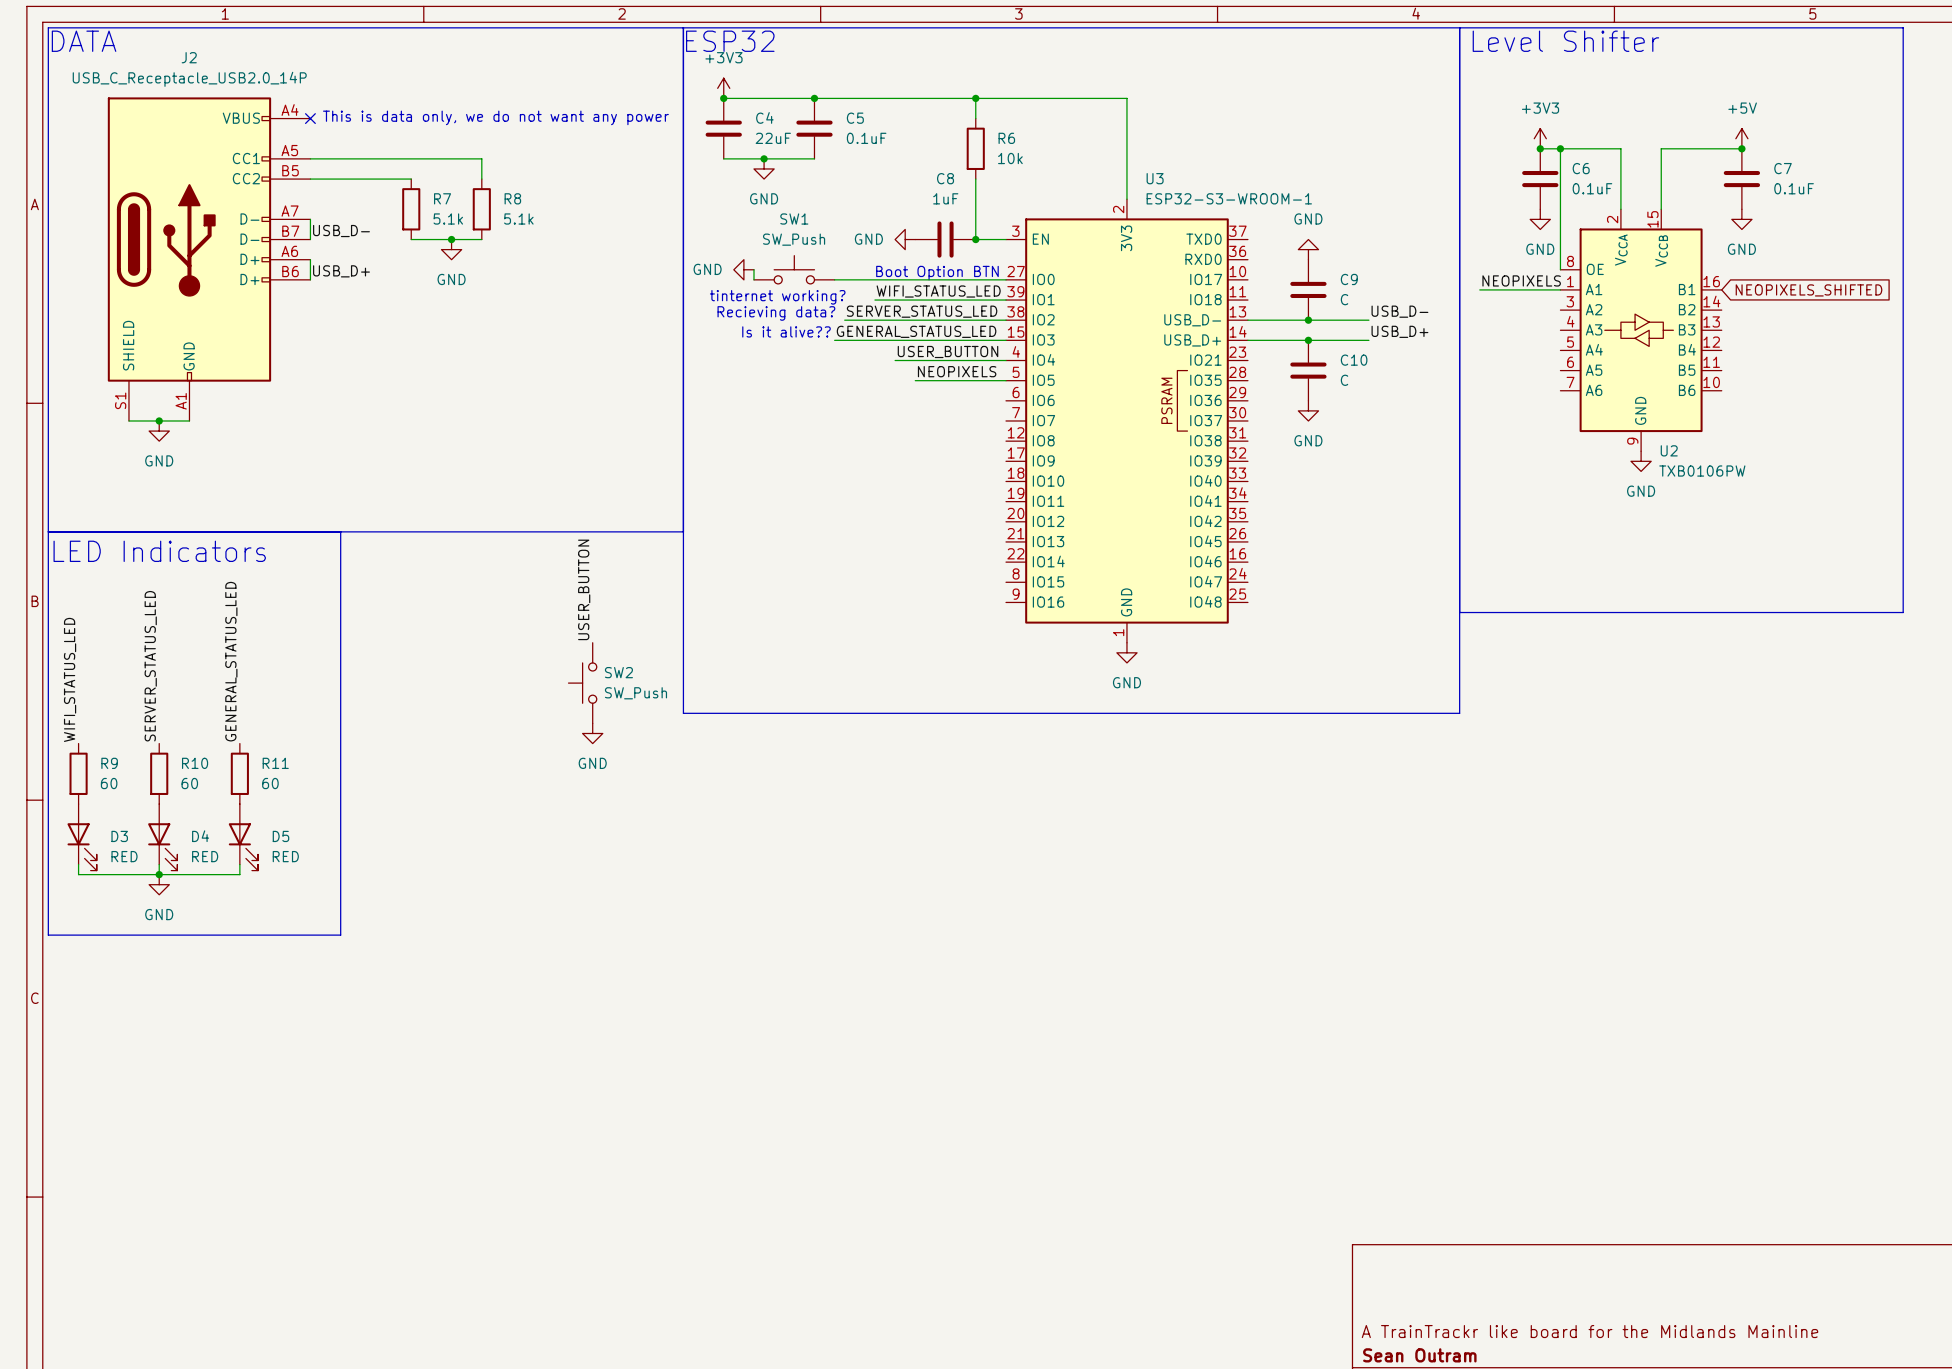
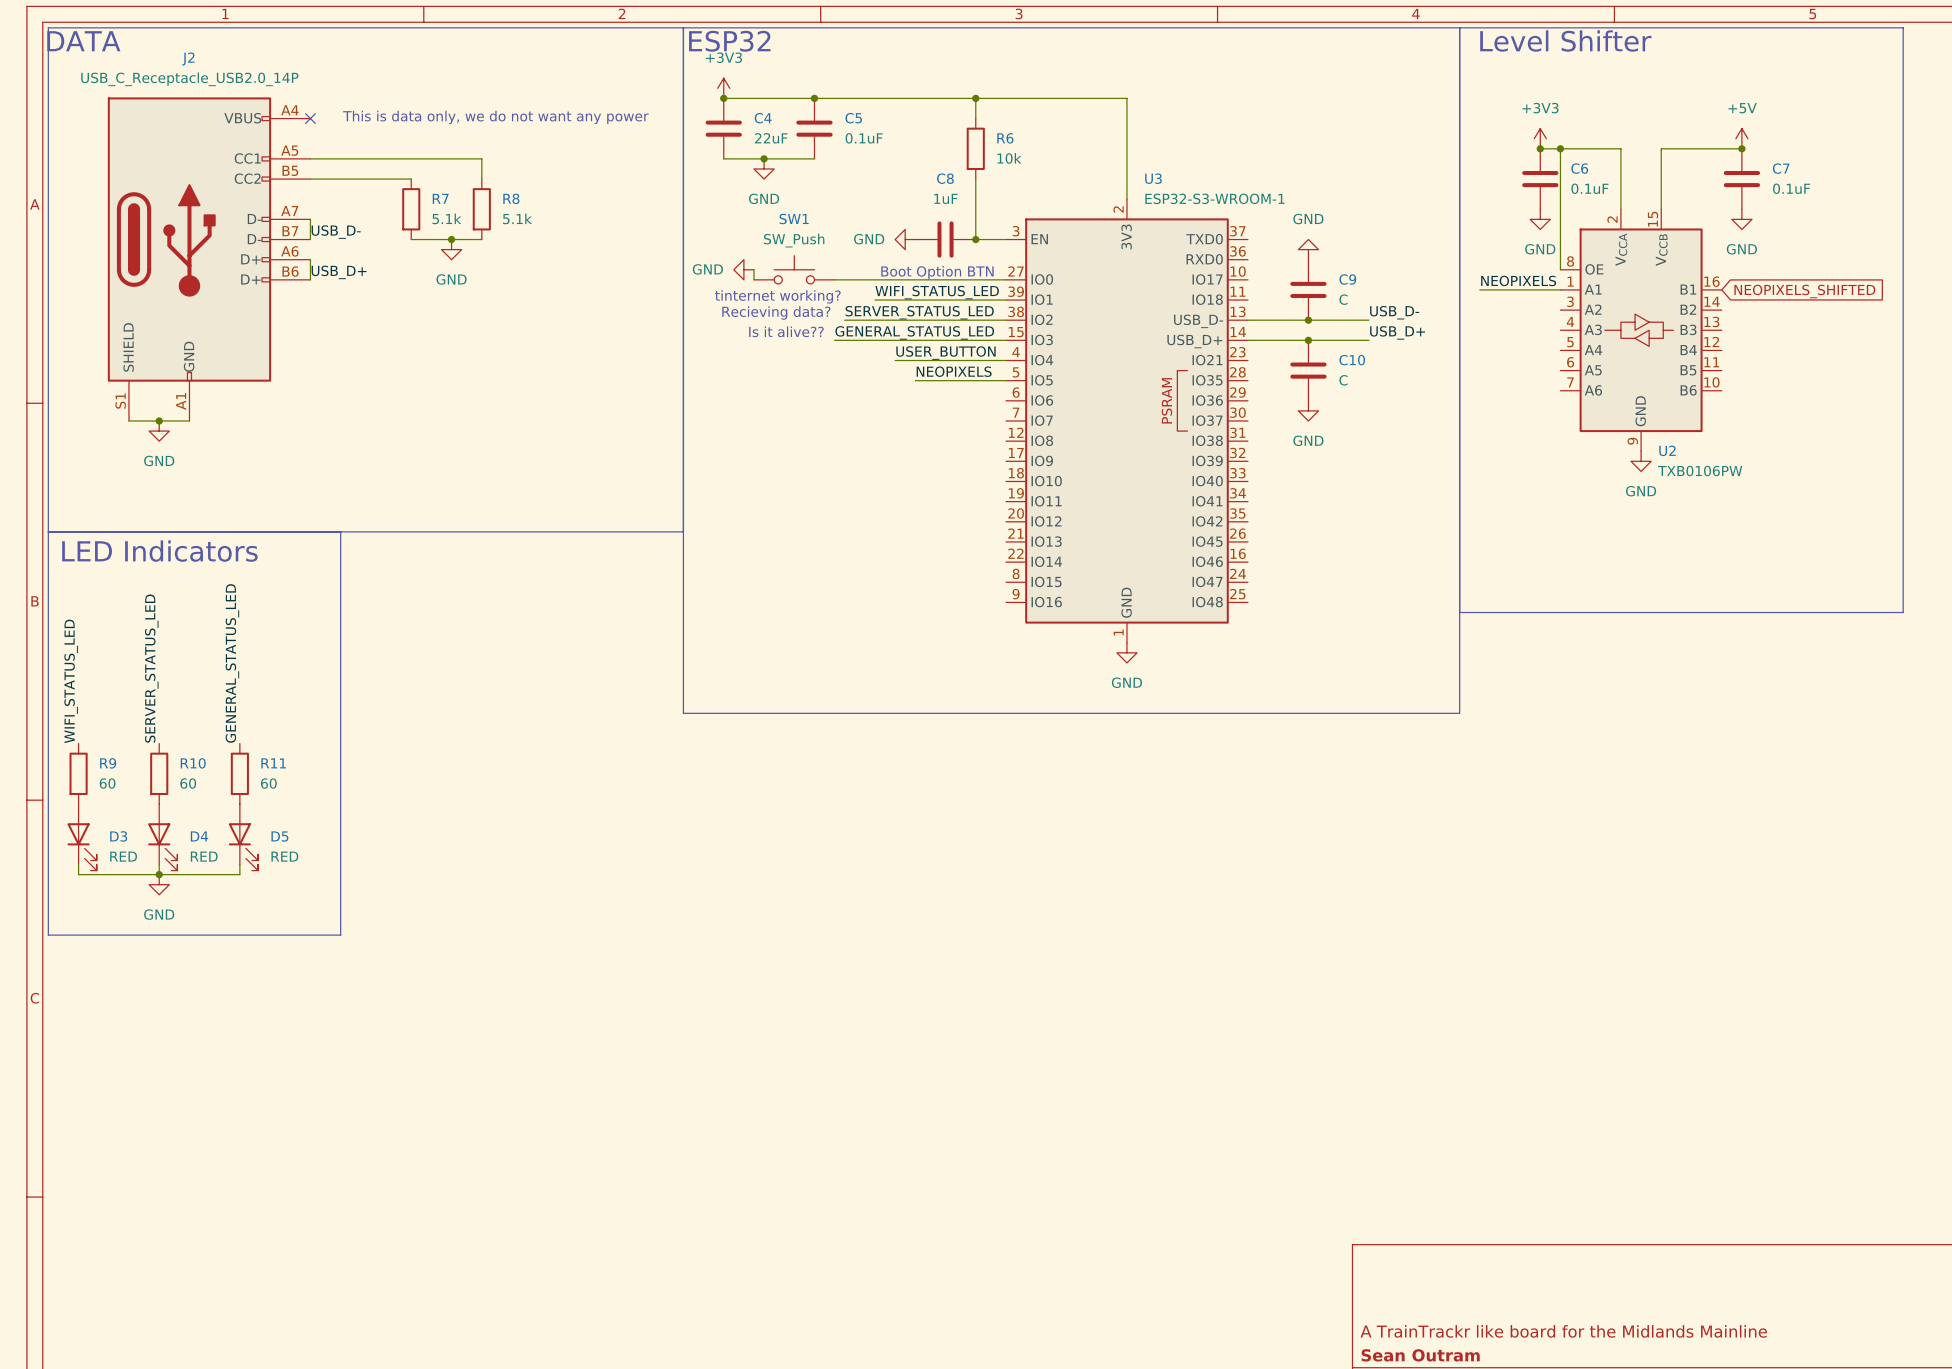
label: USER_BUTTON (584, 589) -> none
SW2: SW_Push (582, 683) -> none
power symbol: GND (592, 733) -> none

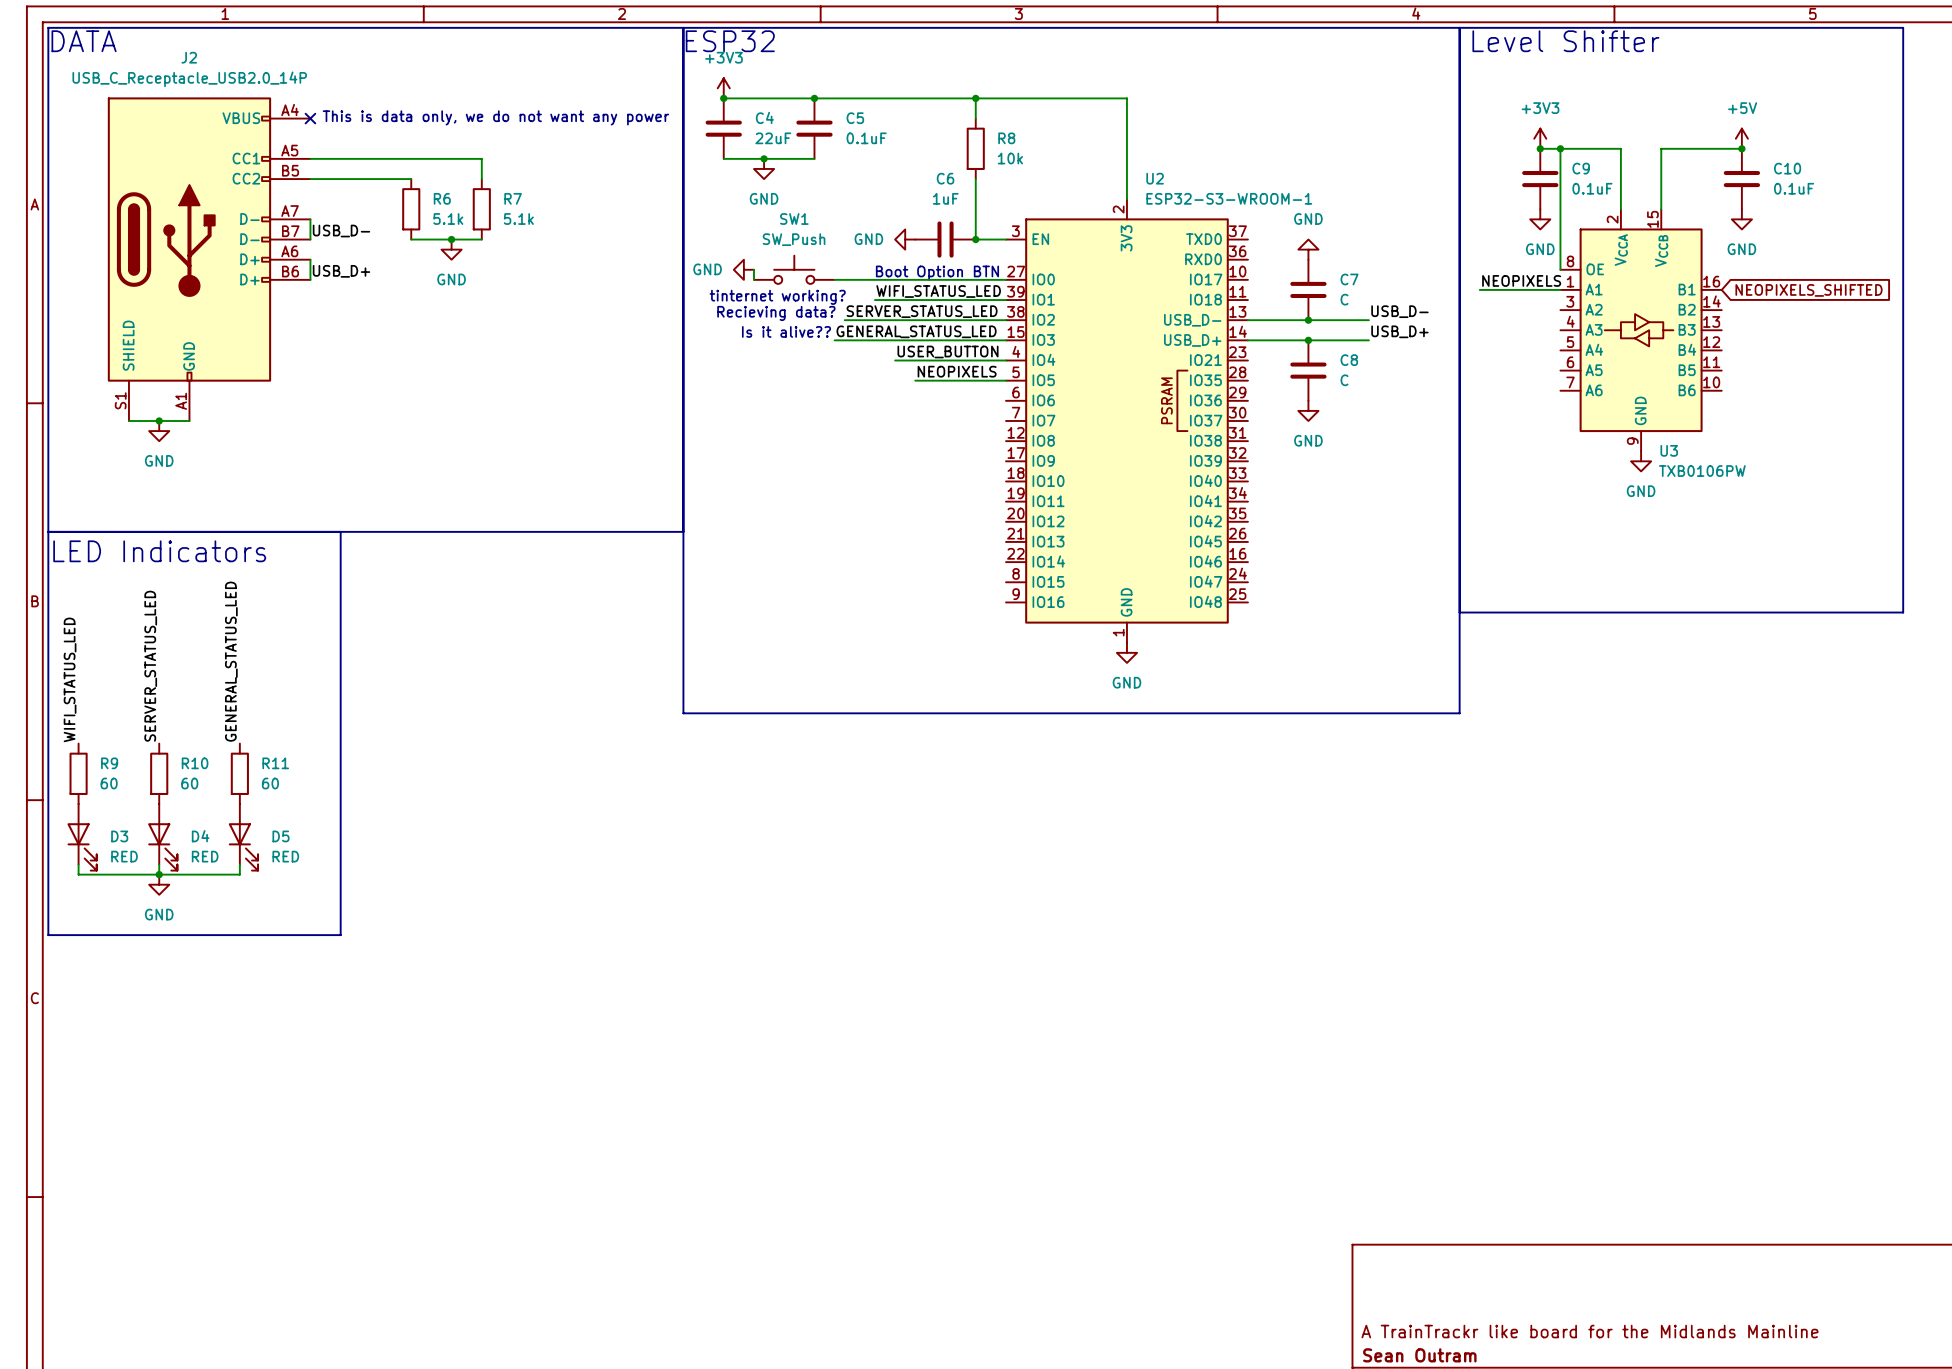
R6 name: R6 (1005, 138) -> R8 (1006, 138)
C6 name: C6 (1579, 168) -> C9 (1581, 168)
C7 name: C7 (1781, 168) -> C10 (1787, 168)
C8 name: C8 (945, 178) -> C6 (945, 178)
U3 name: U3 (1153, 178) -> U2 (1155, 178)
R7 name: R7 (440, 198) -> R6 (442, 198)
R8 name: R8 (511, 198) -> R7 (513, 198)
C9 name: C9 (1347, 279) -> C7 (1349, 279)
C10 name: C10 (1352, 360) -> C8 (1349, 360)
U2 name: U2 (1667, 450) -> U3 (1669, 450)

